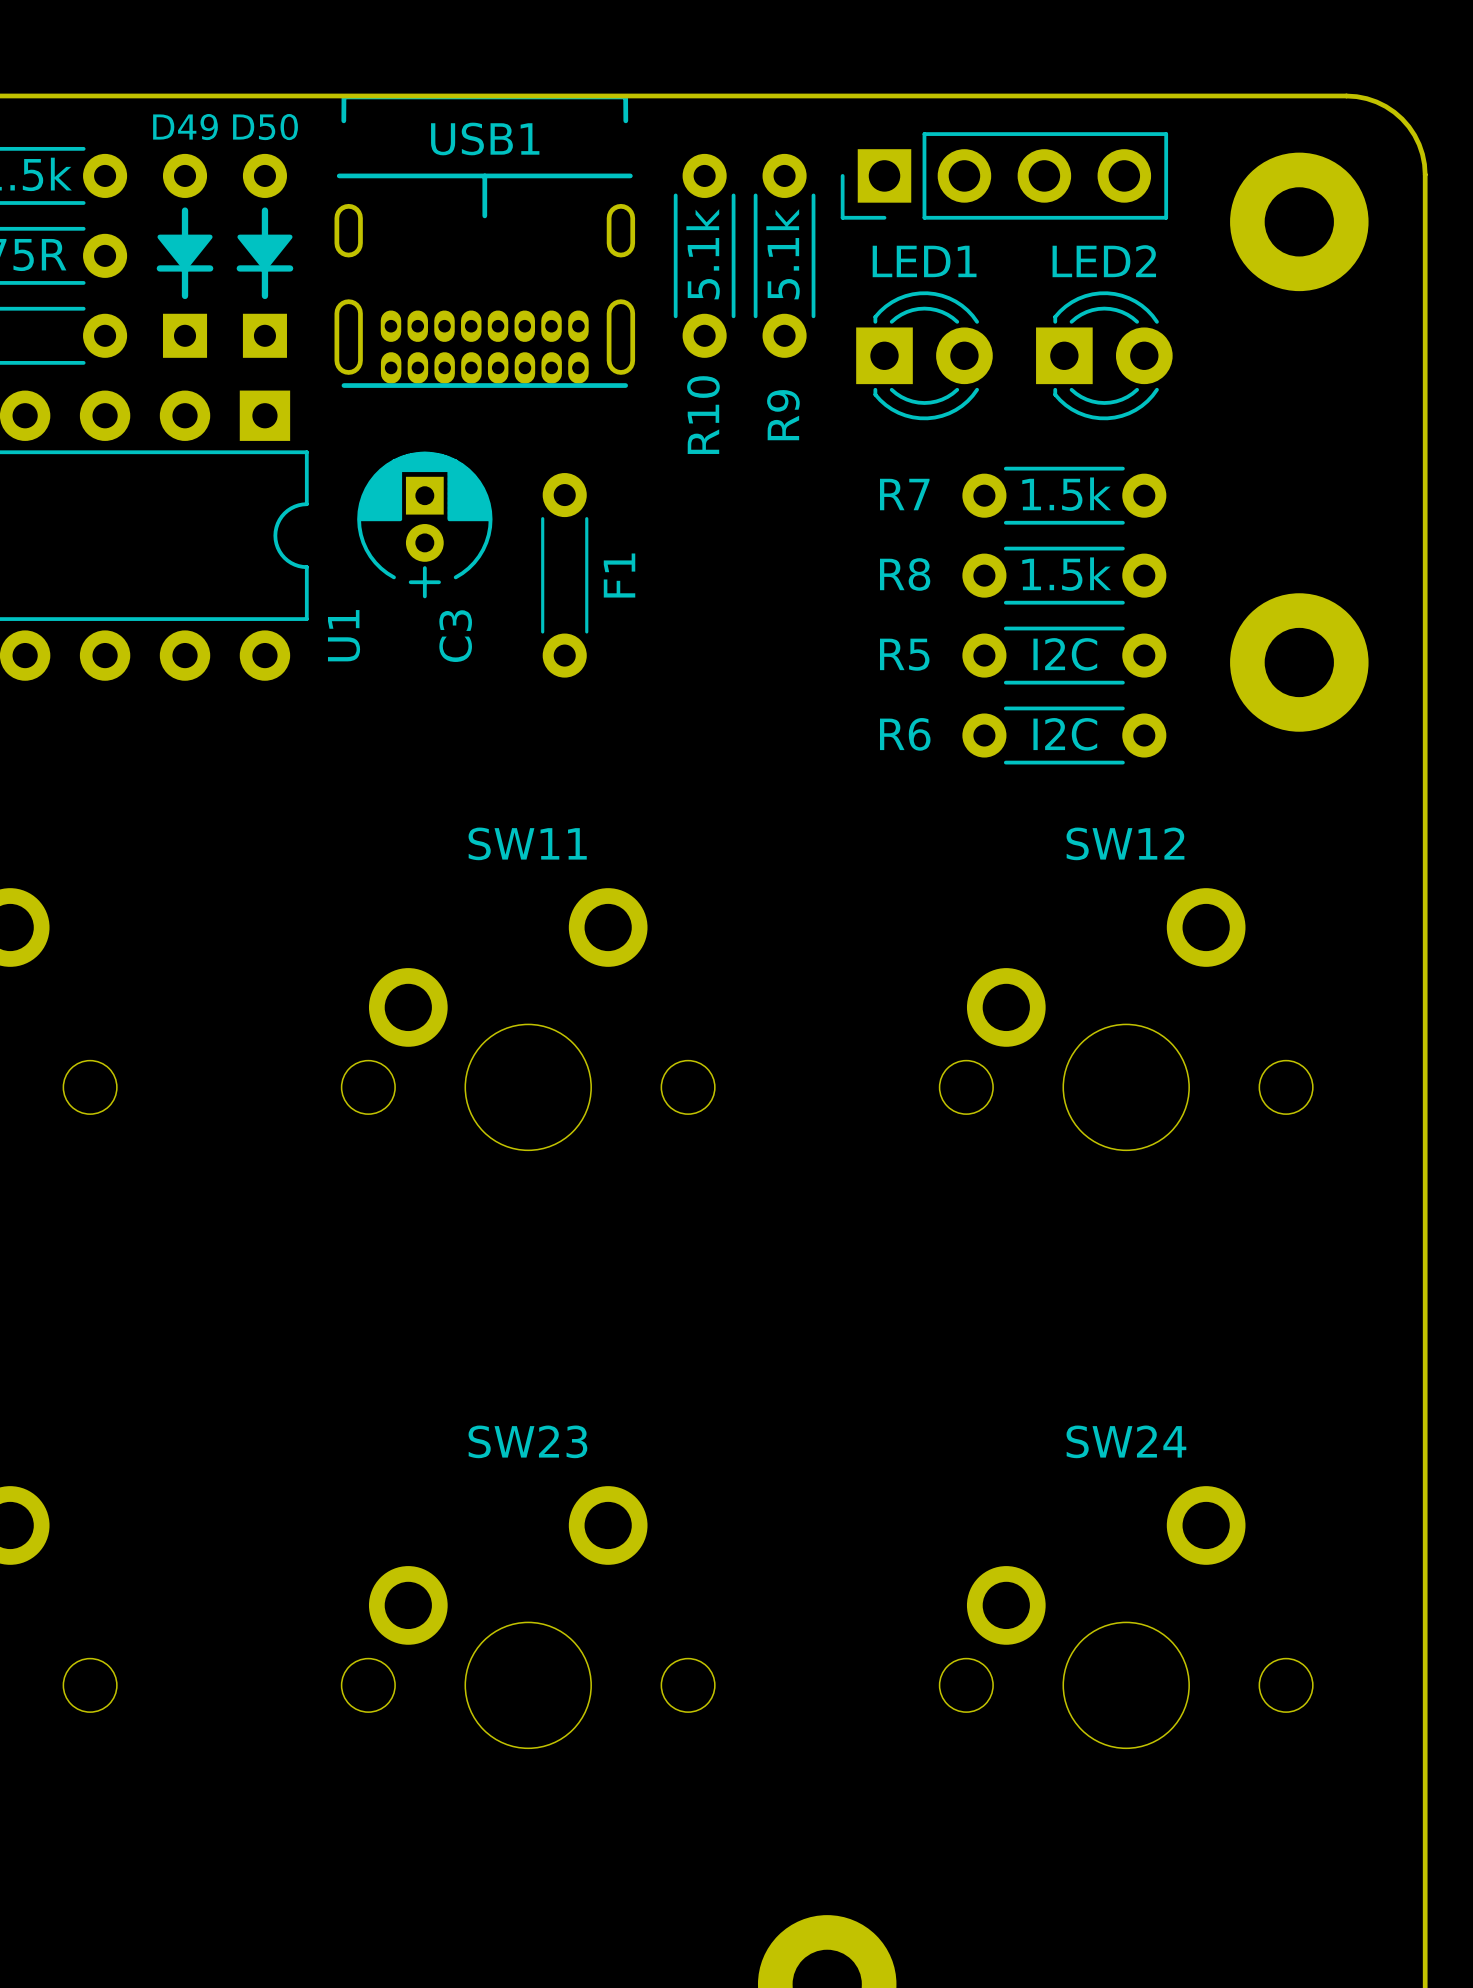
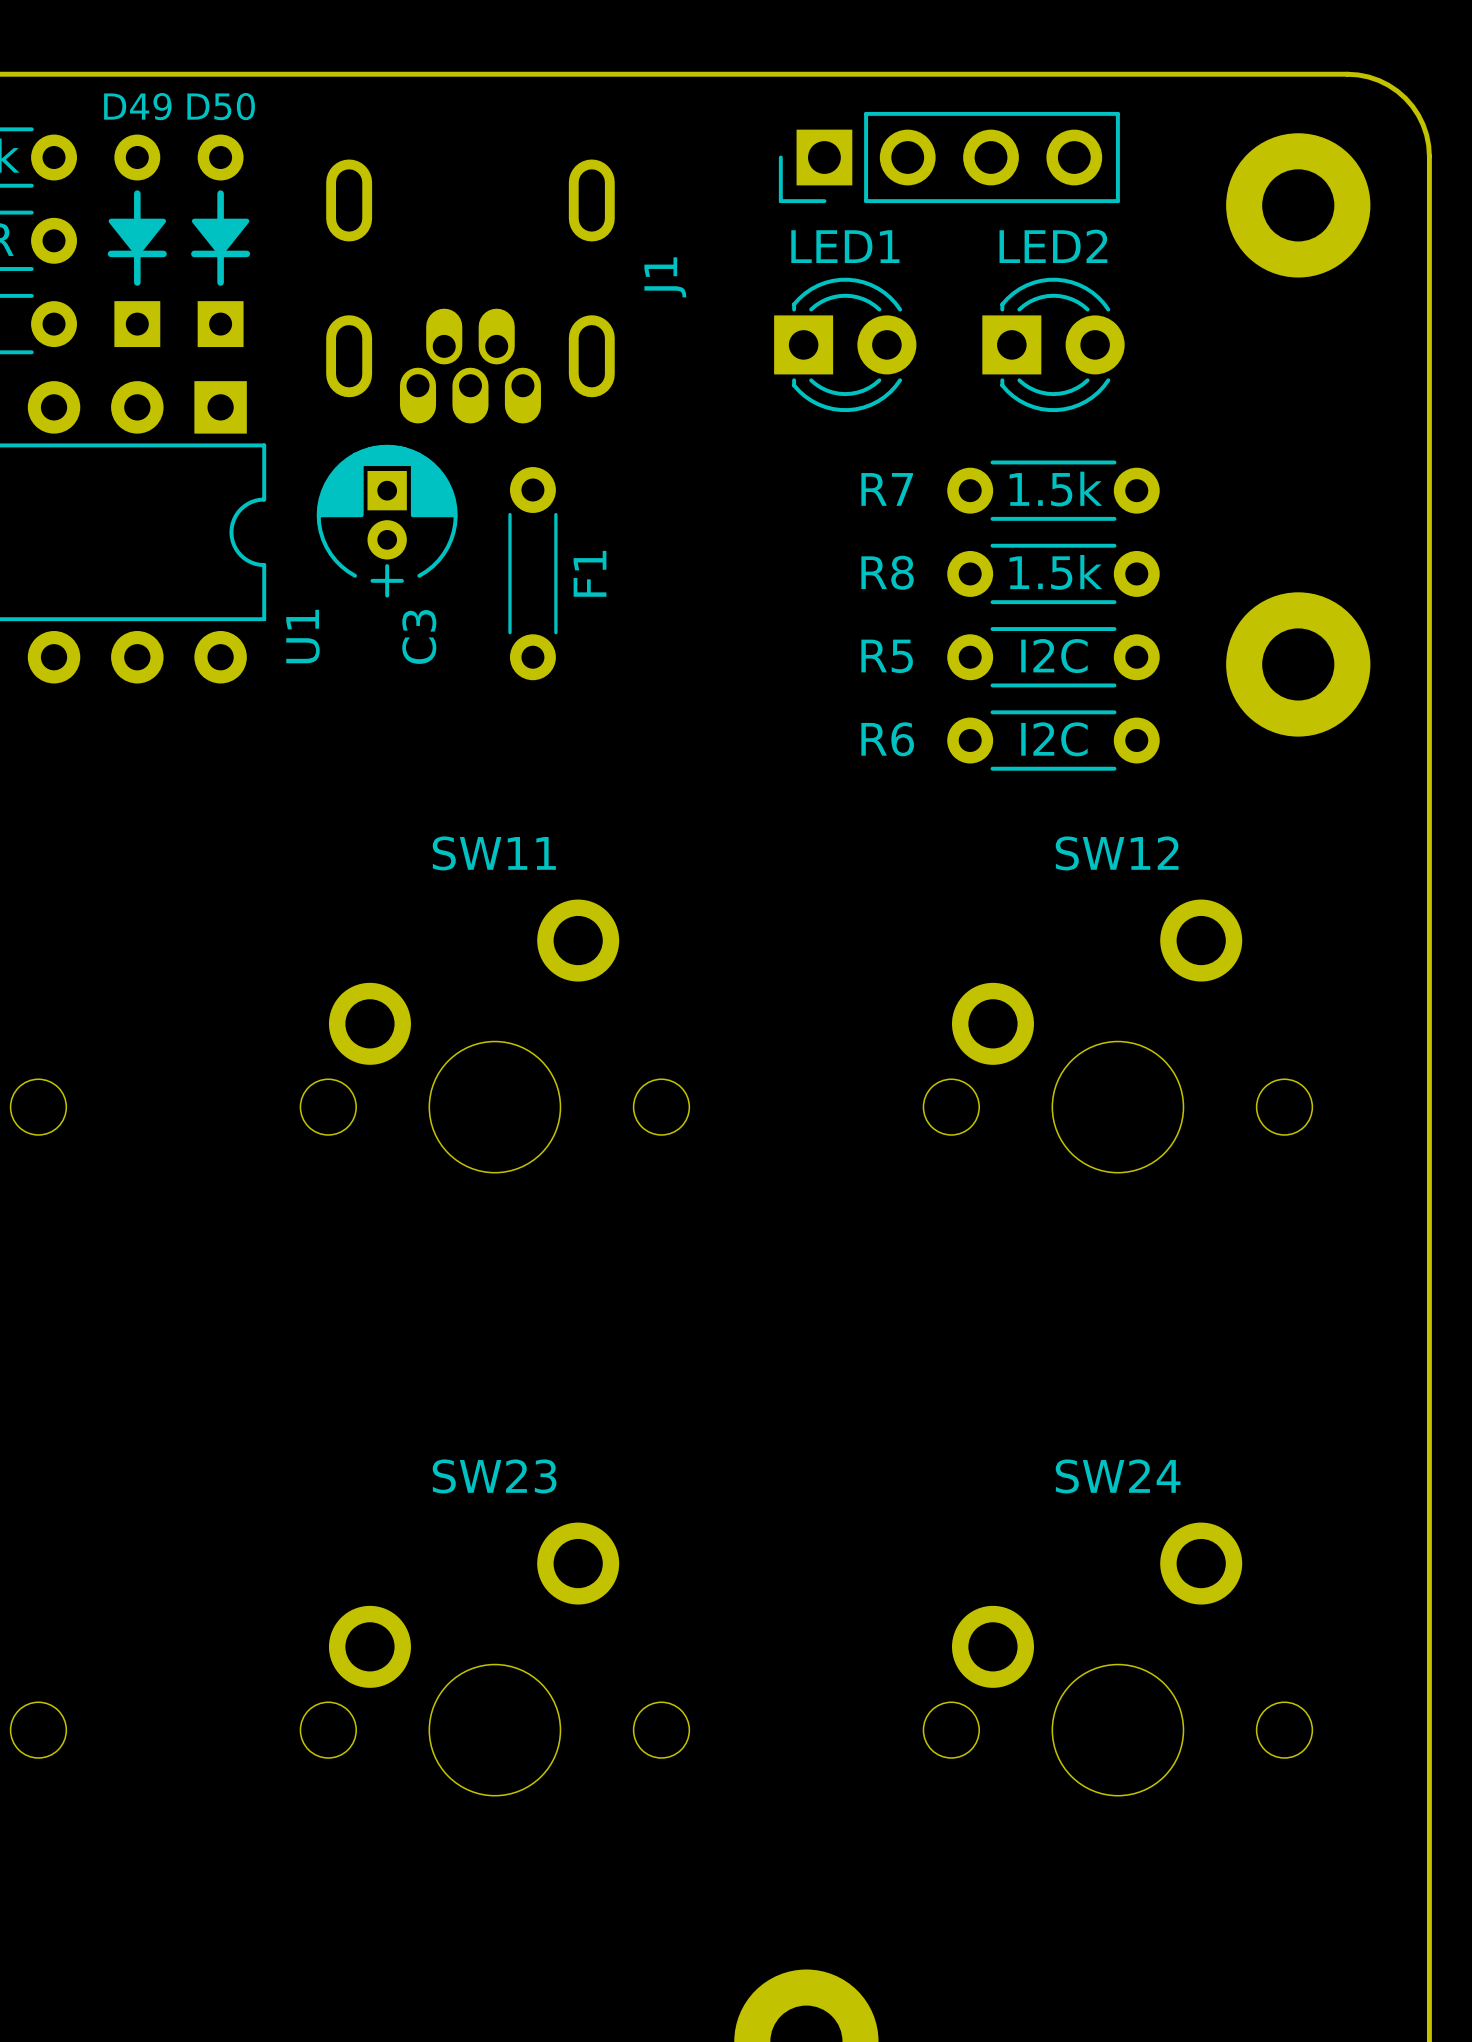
part position: (1004, 175) -> (949, 157)
USB1: (484, 241) -> none
R10: 5.1k (704, 255) -> none
R9: 5.1k (784, 255) -> none
J1: none -> (470, 291)
LED1 position: (924, 355) -> (845, 344)
LED2 position: (1104, 355) -> (1053, 344)

